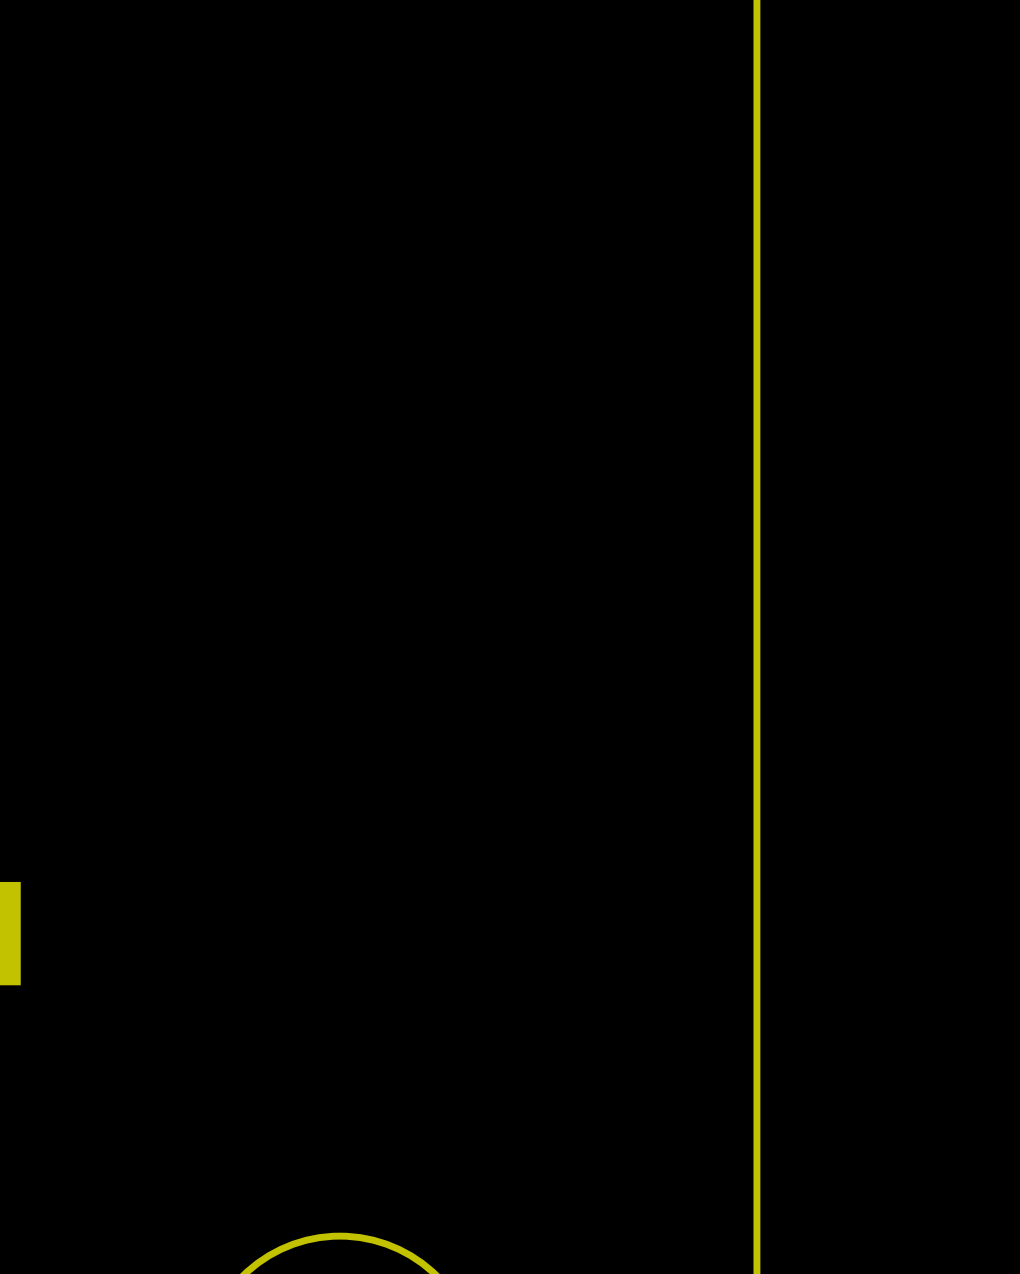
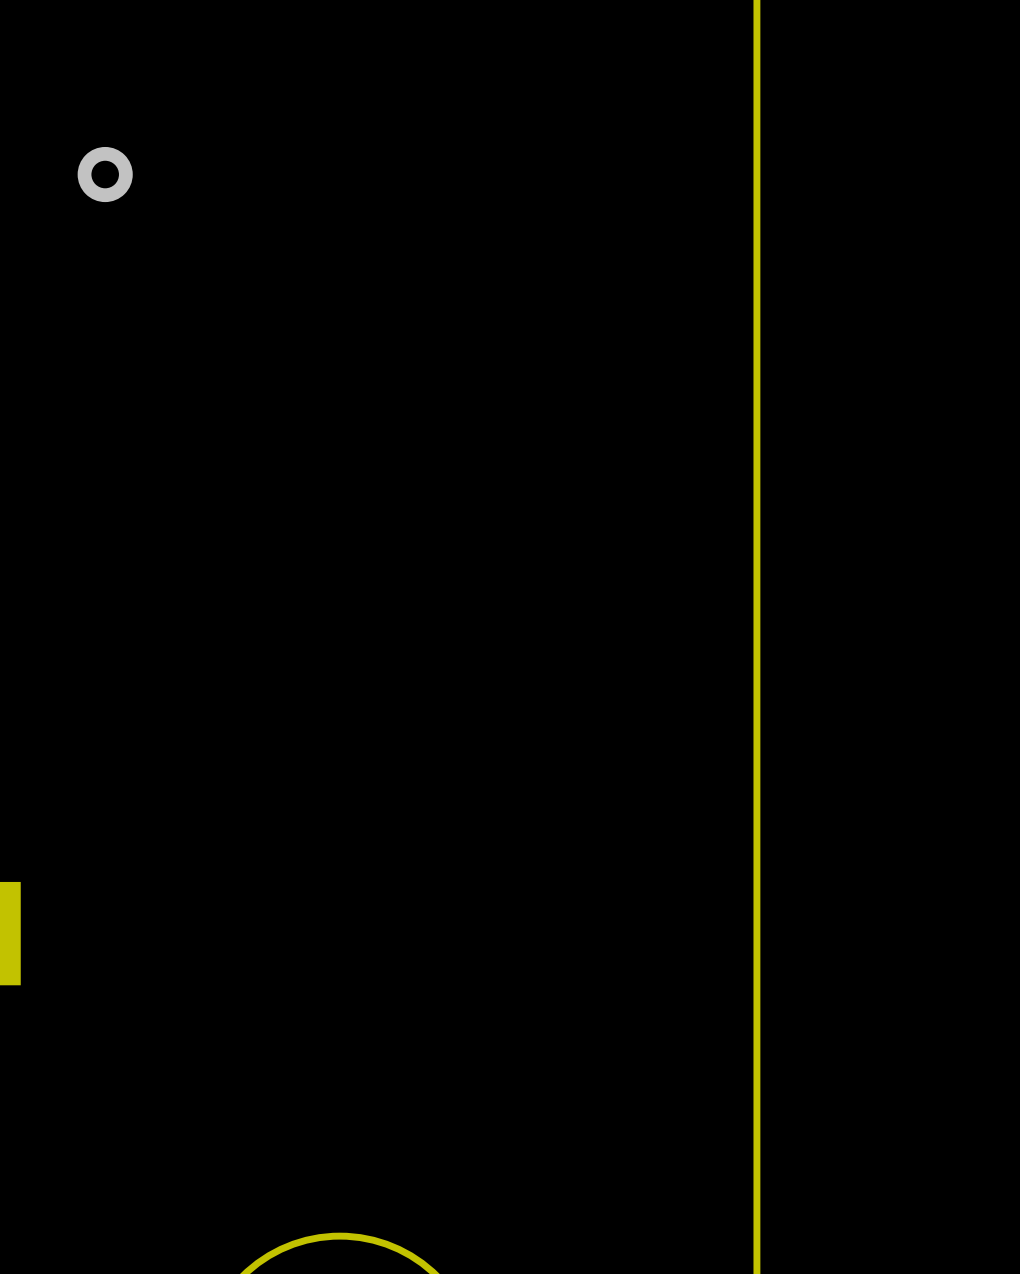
via: none -> (105, 174)

